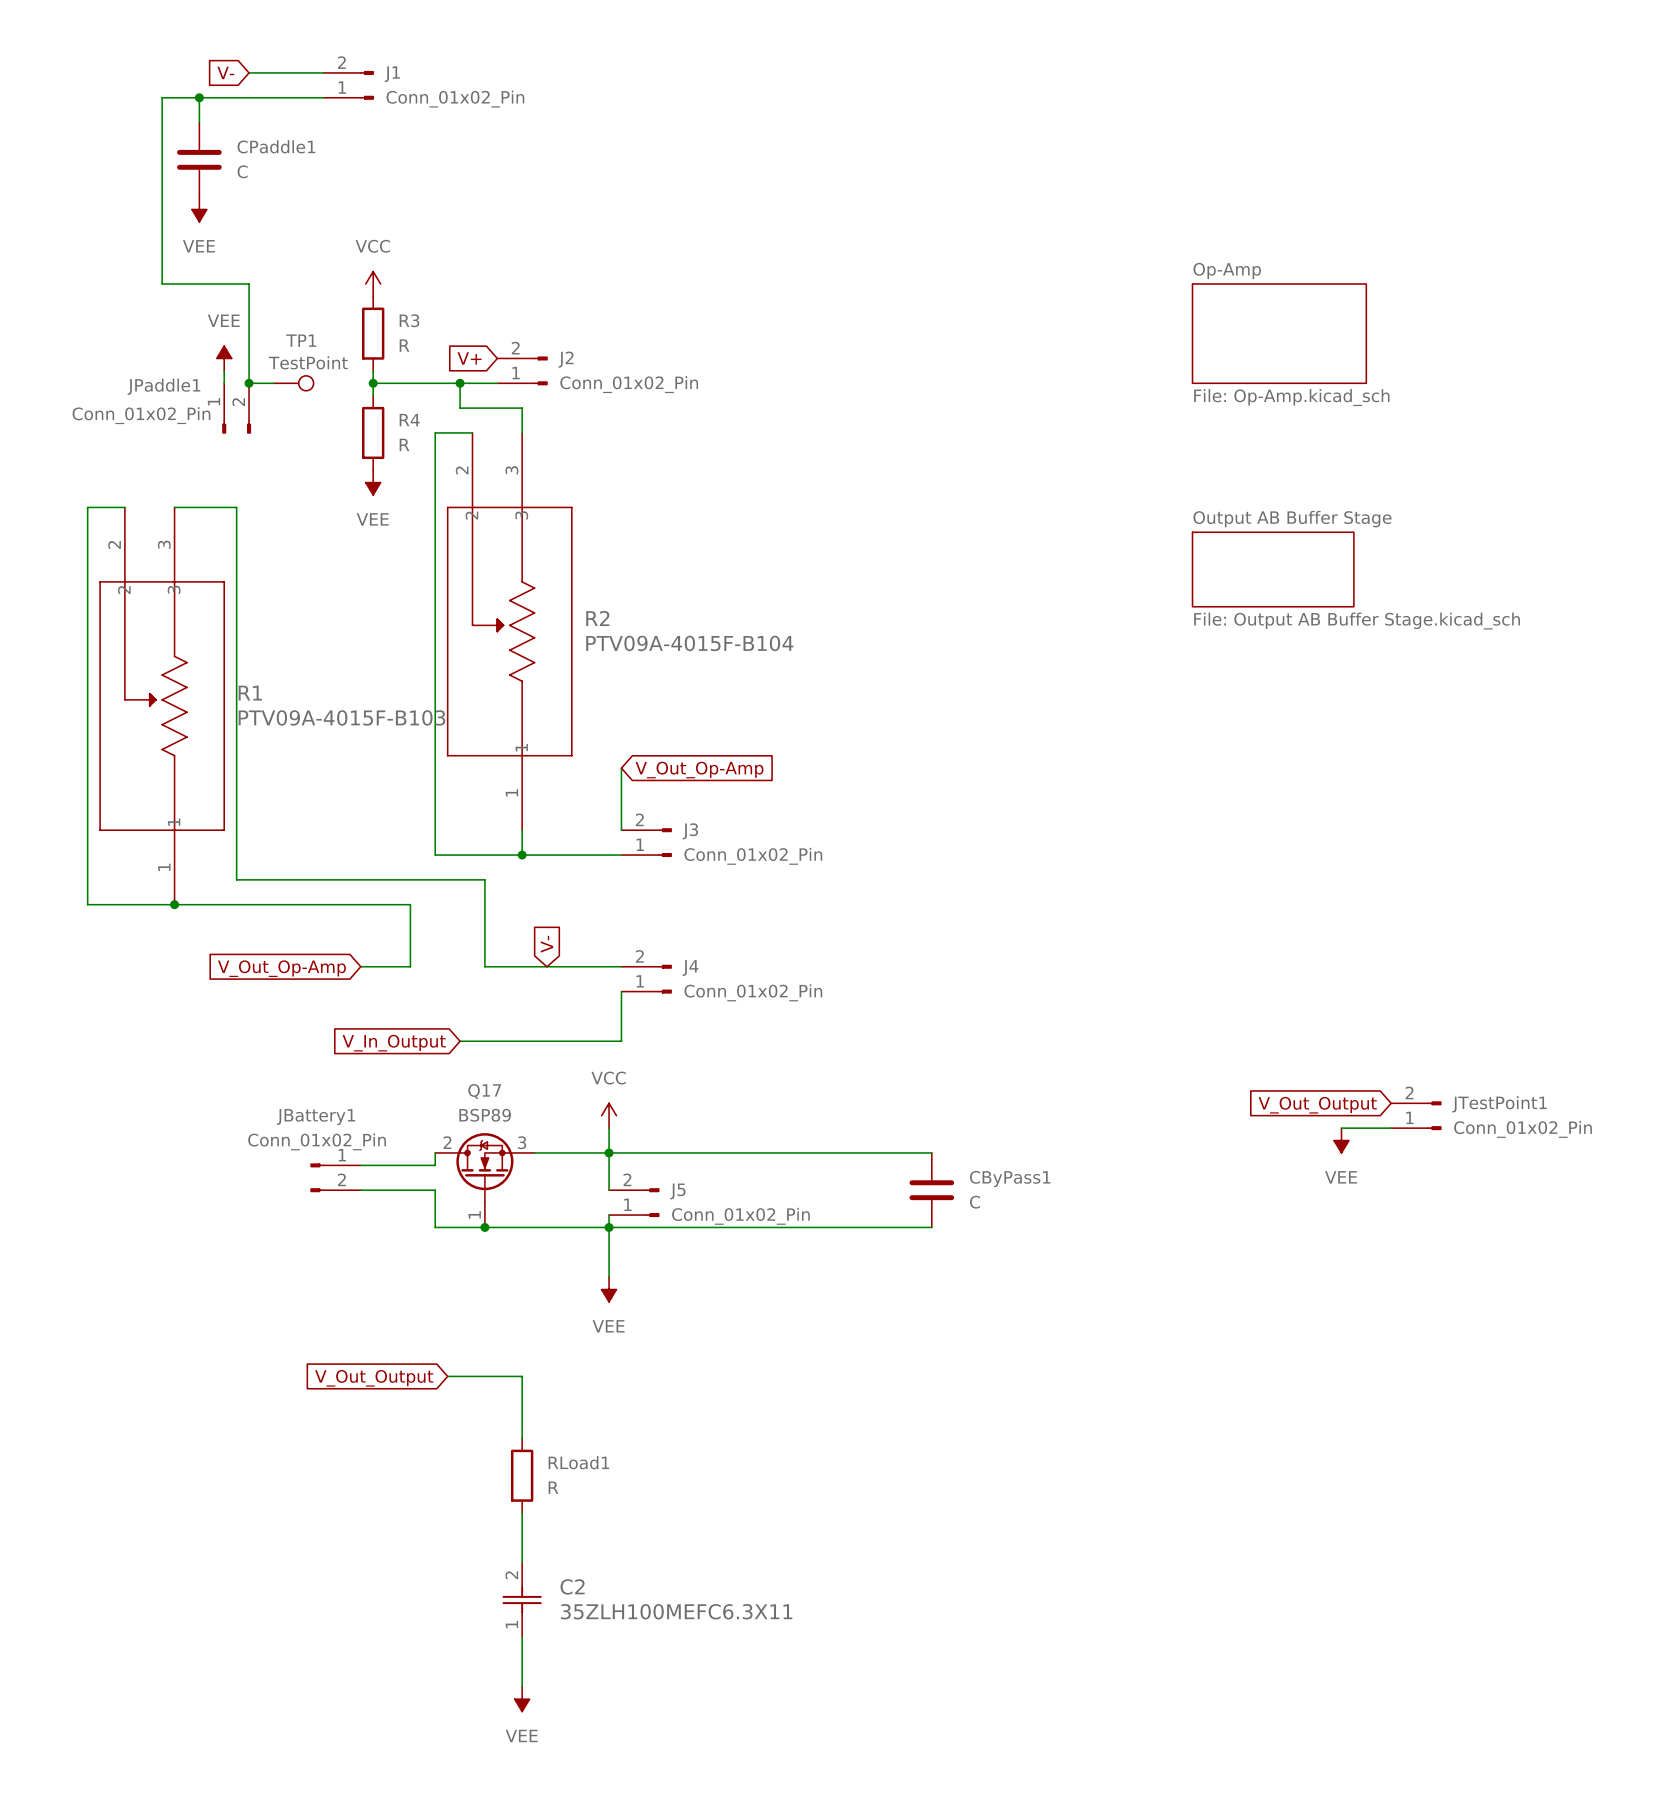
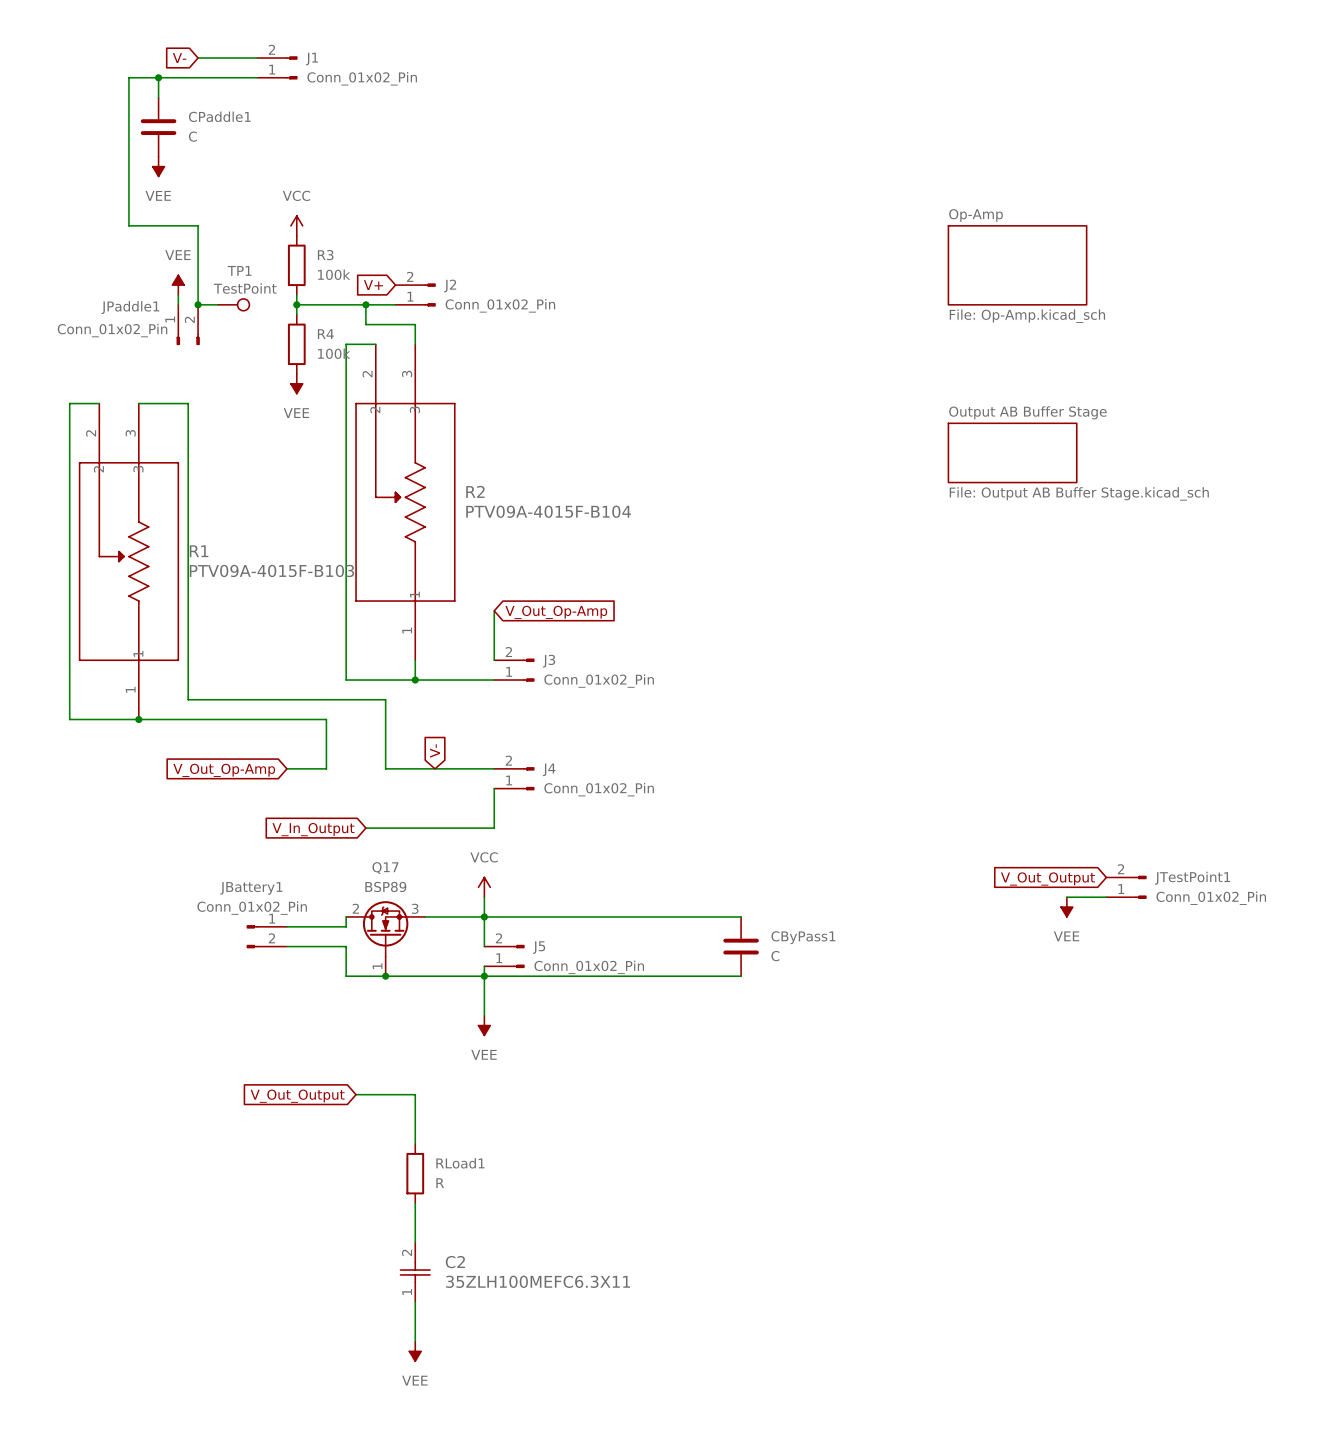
R3 value: R (404, 345) -> 100k (334, 274)
R4 value: R (404, 444) -> 100k (334, 353)

